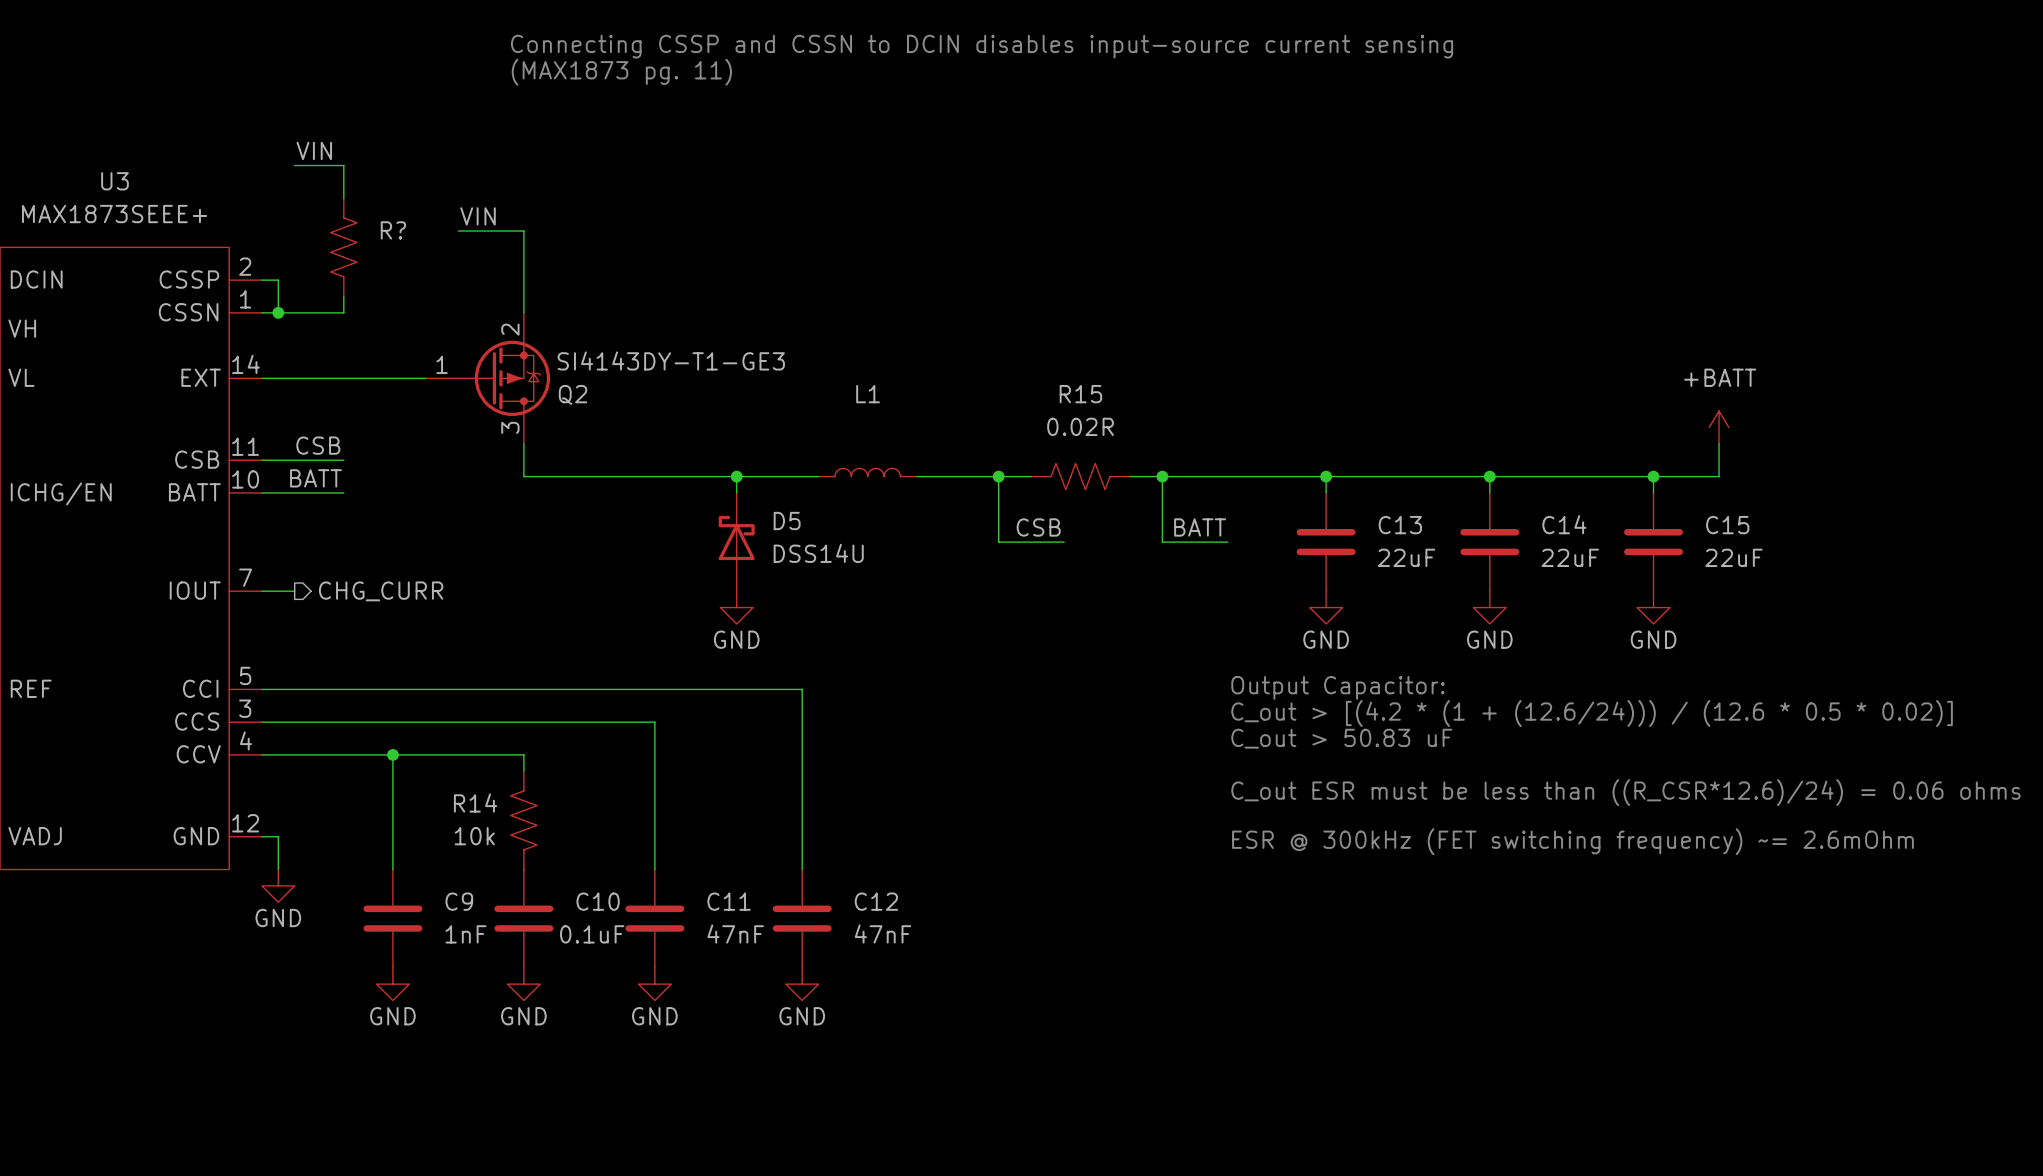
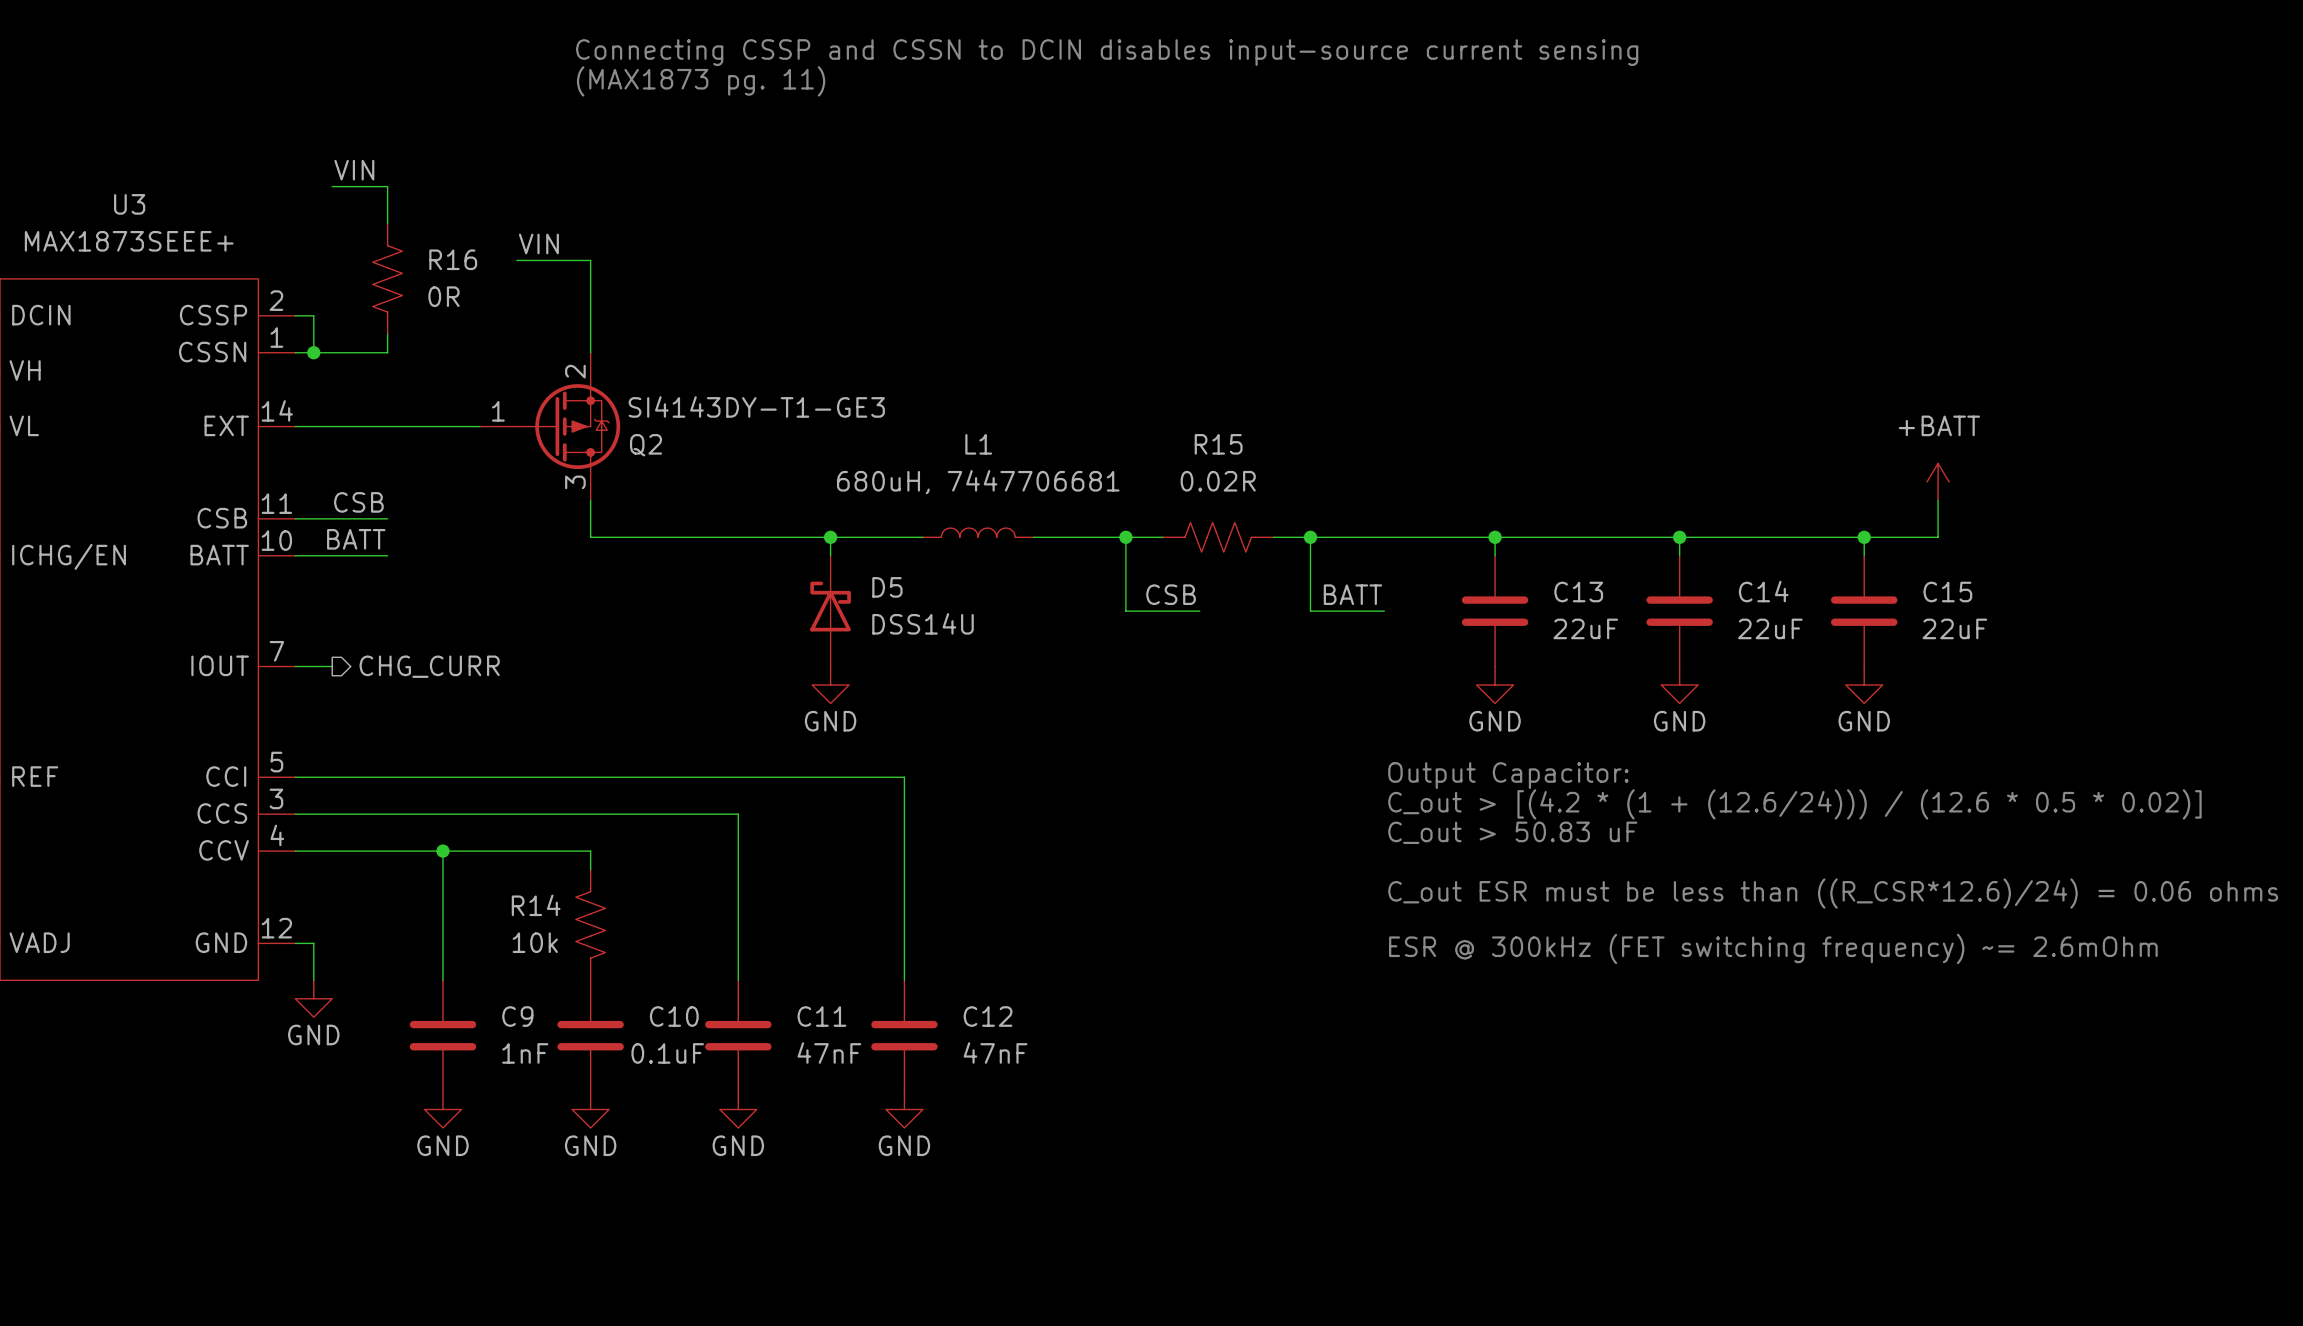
R? name: R? (393, 230) -> R16 (453, 259)
R? value: none -> 0R (444, 296)
L1 value: none -> 680uH, 7447706681 (978, 482)

